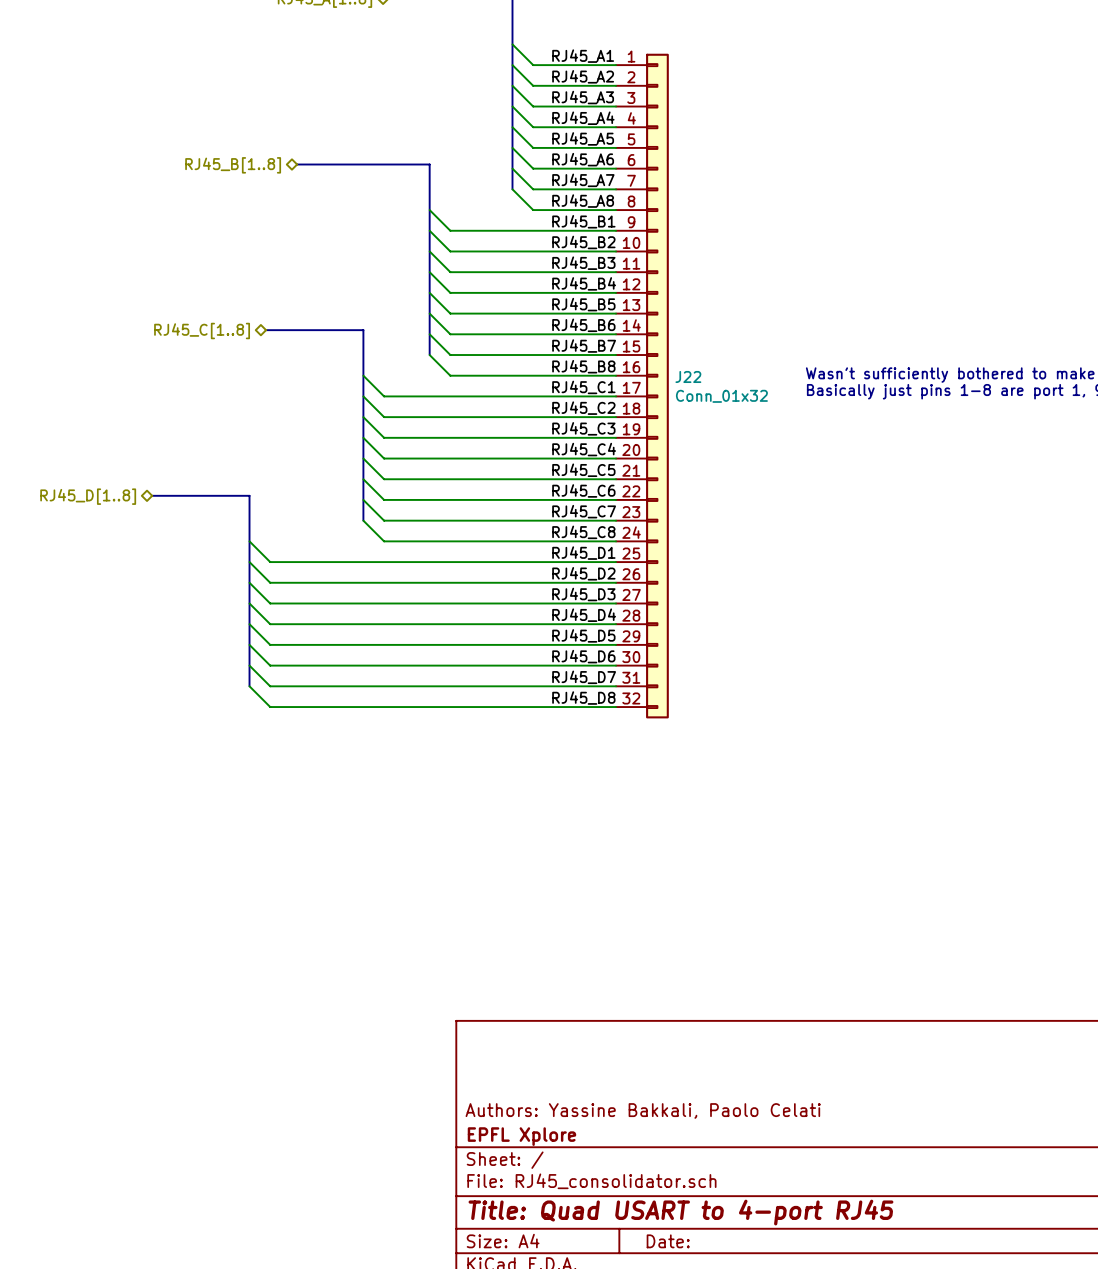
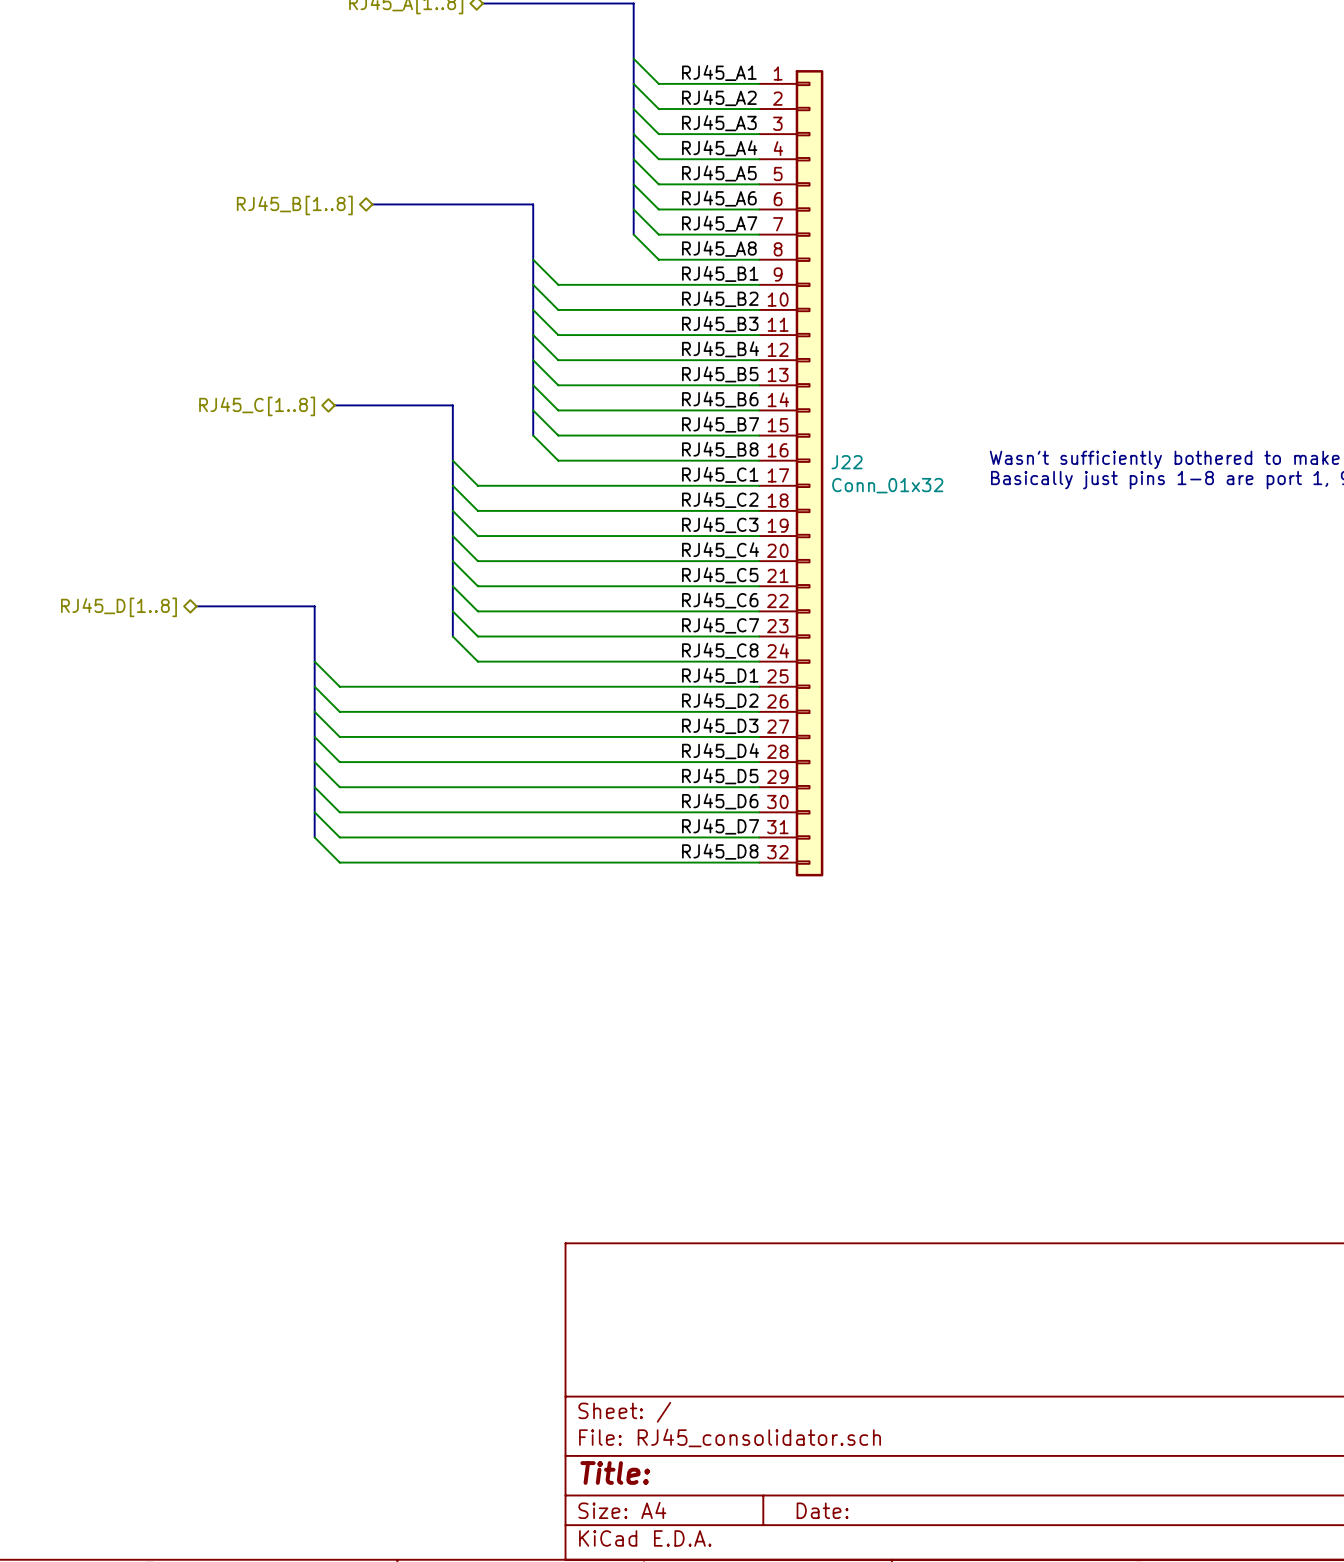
title block: Authors: Yassine Bakkali, Paolo Celati (643, 1110) -> none
title block: EPFL Xplore (521, 1136) -> none
title block: Title: Quad USART to 4-port RJ45 (680, 1212) -> Title: (615, 1472)

